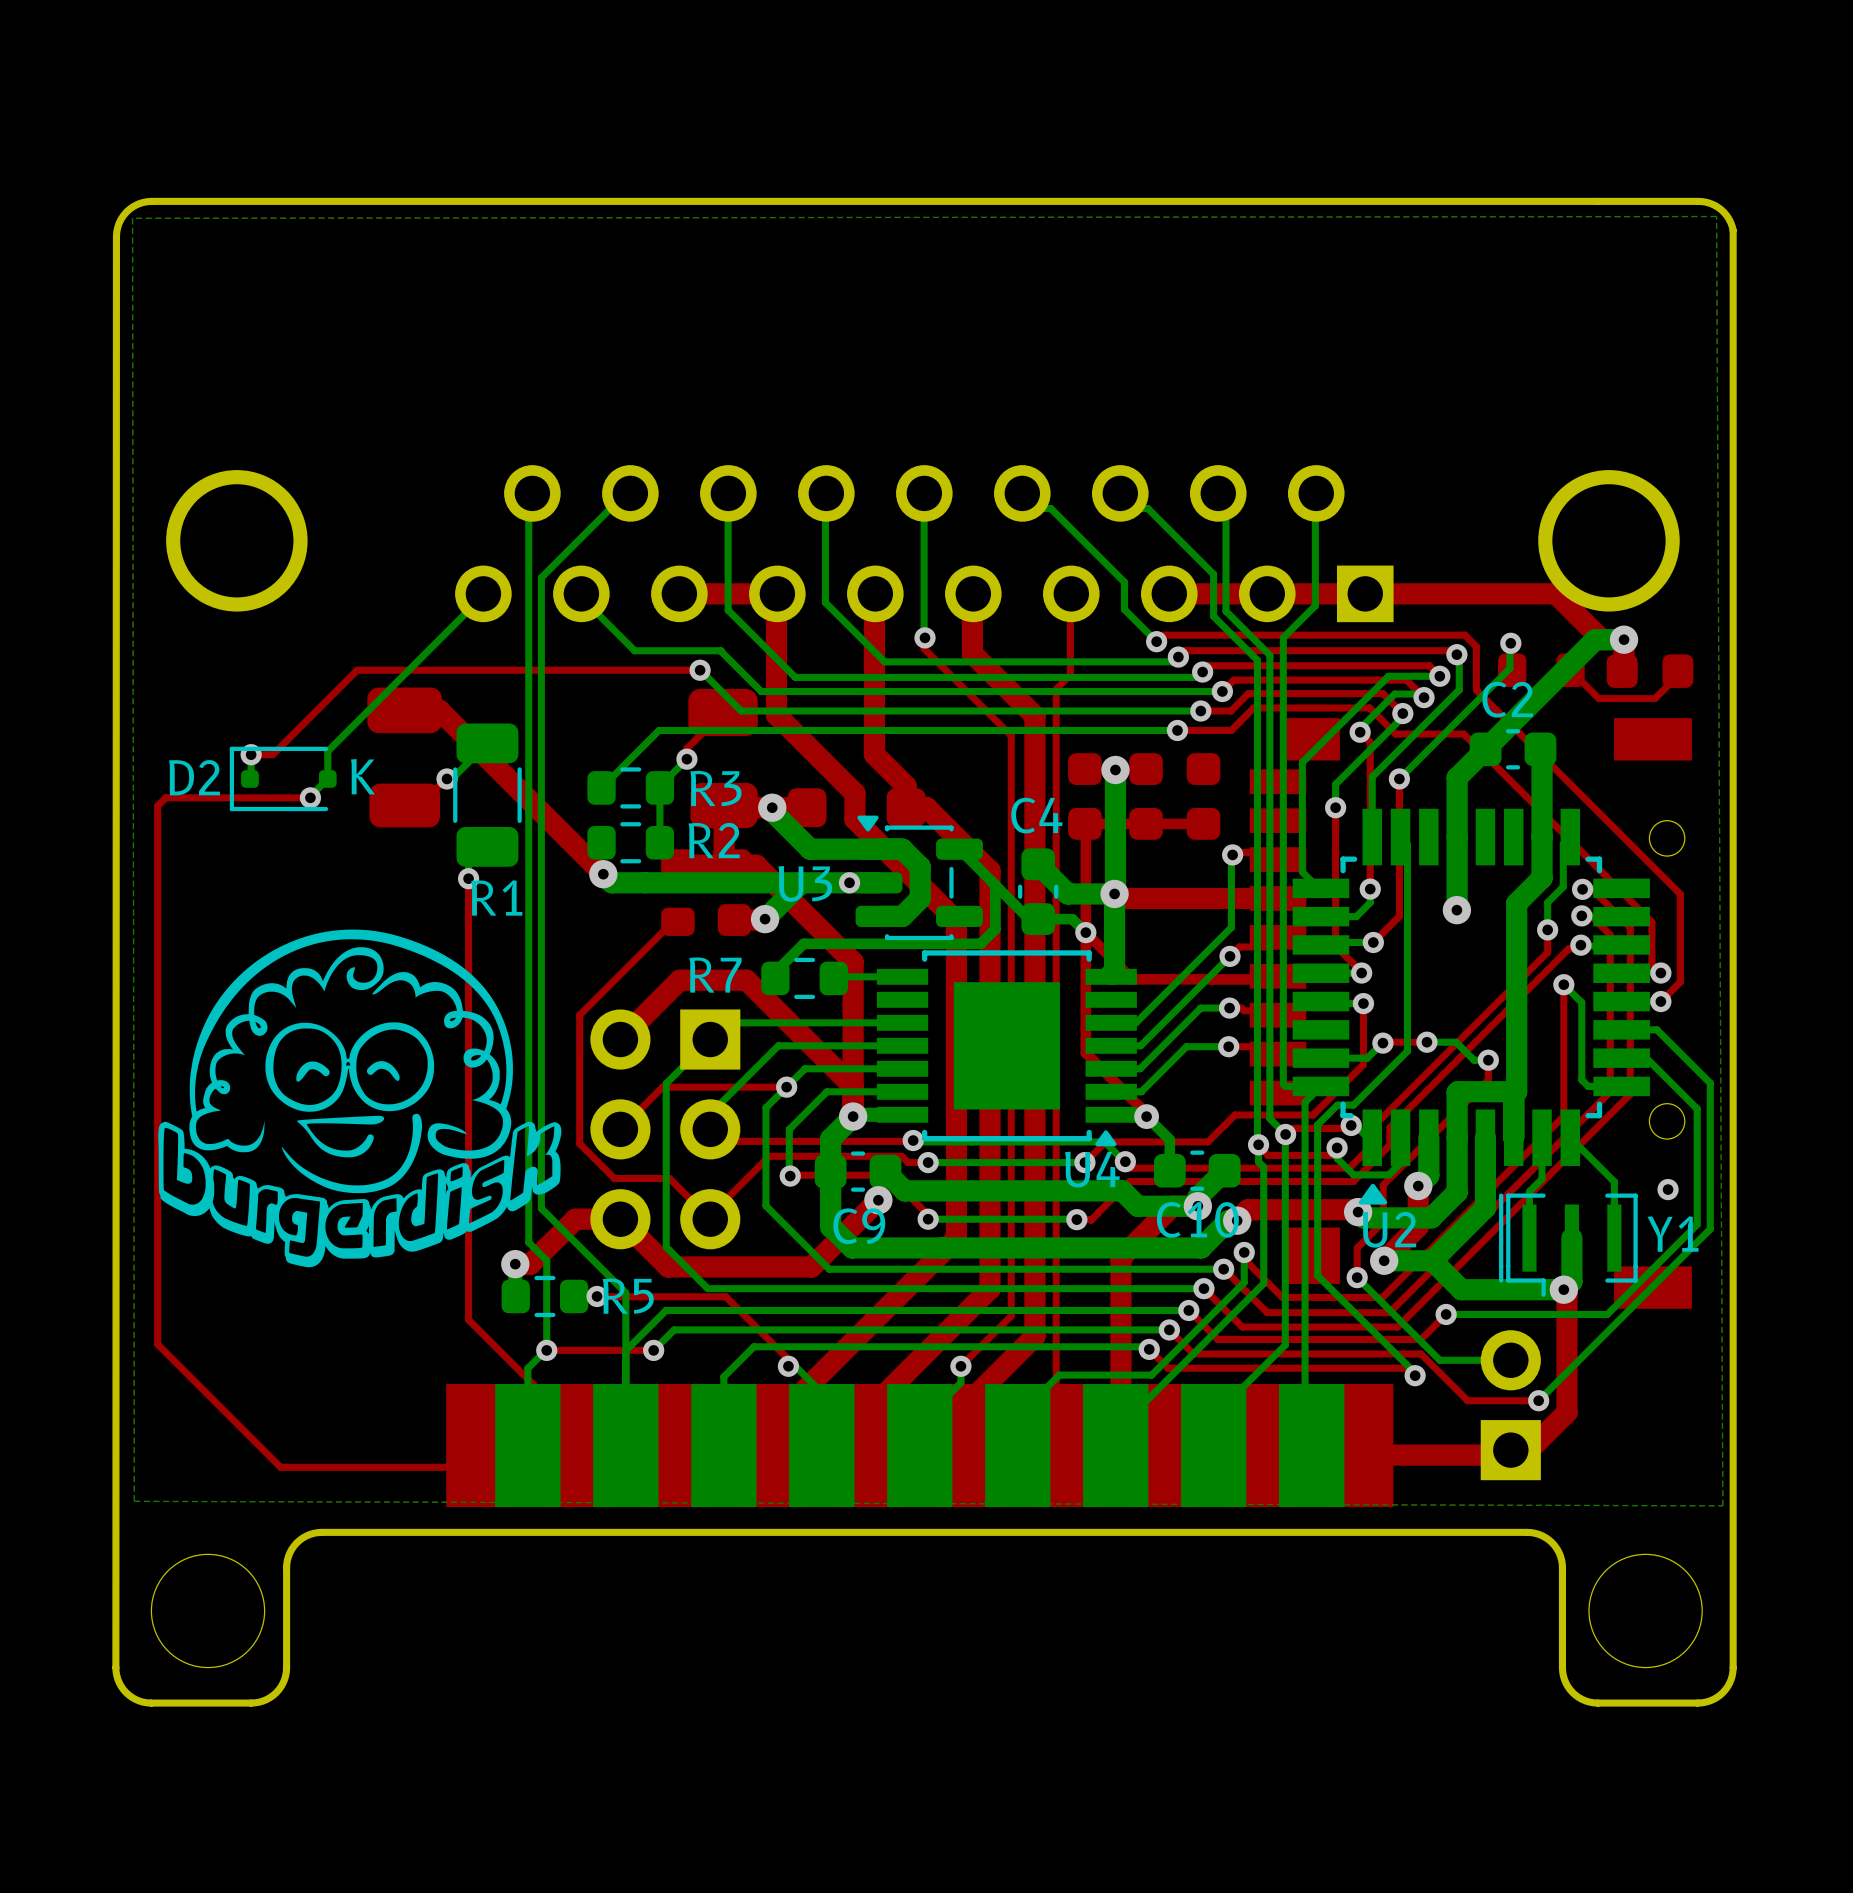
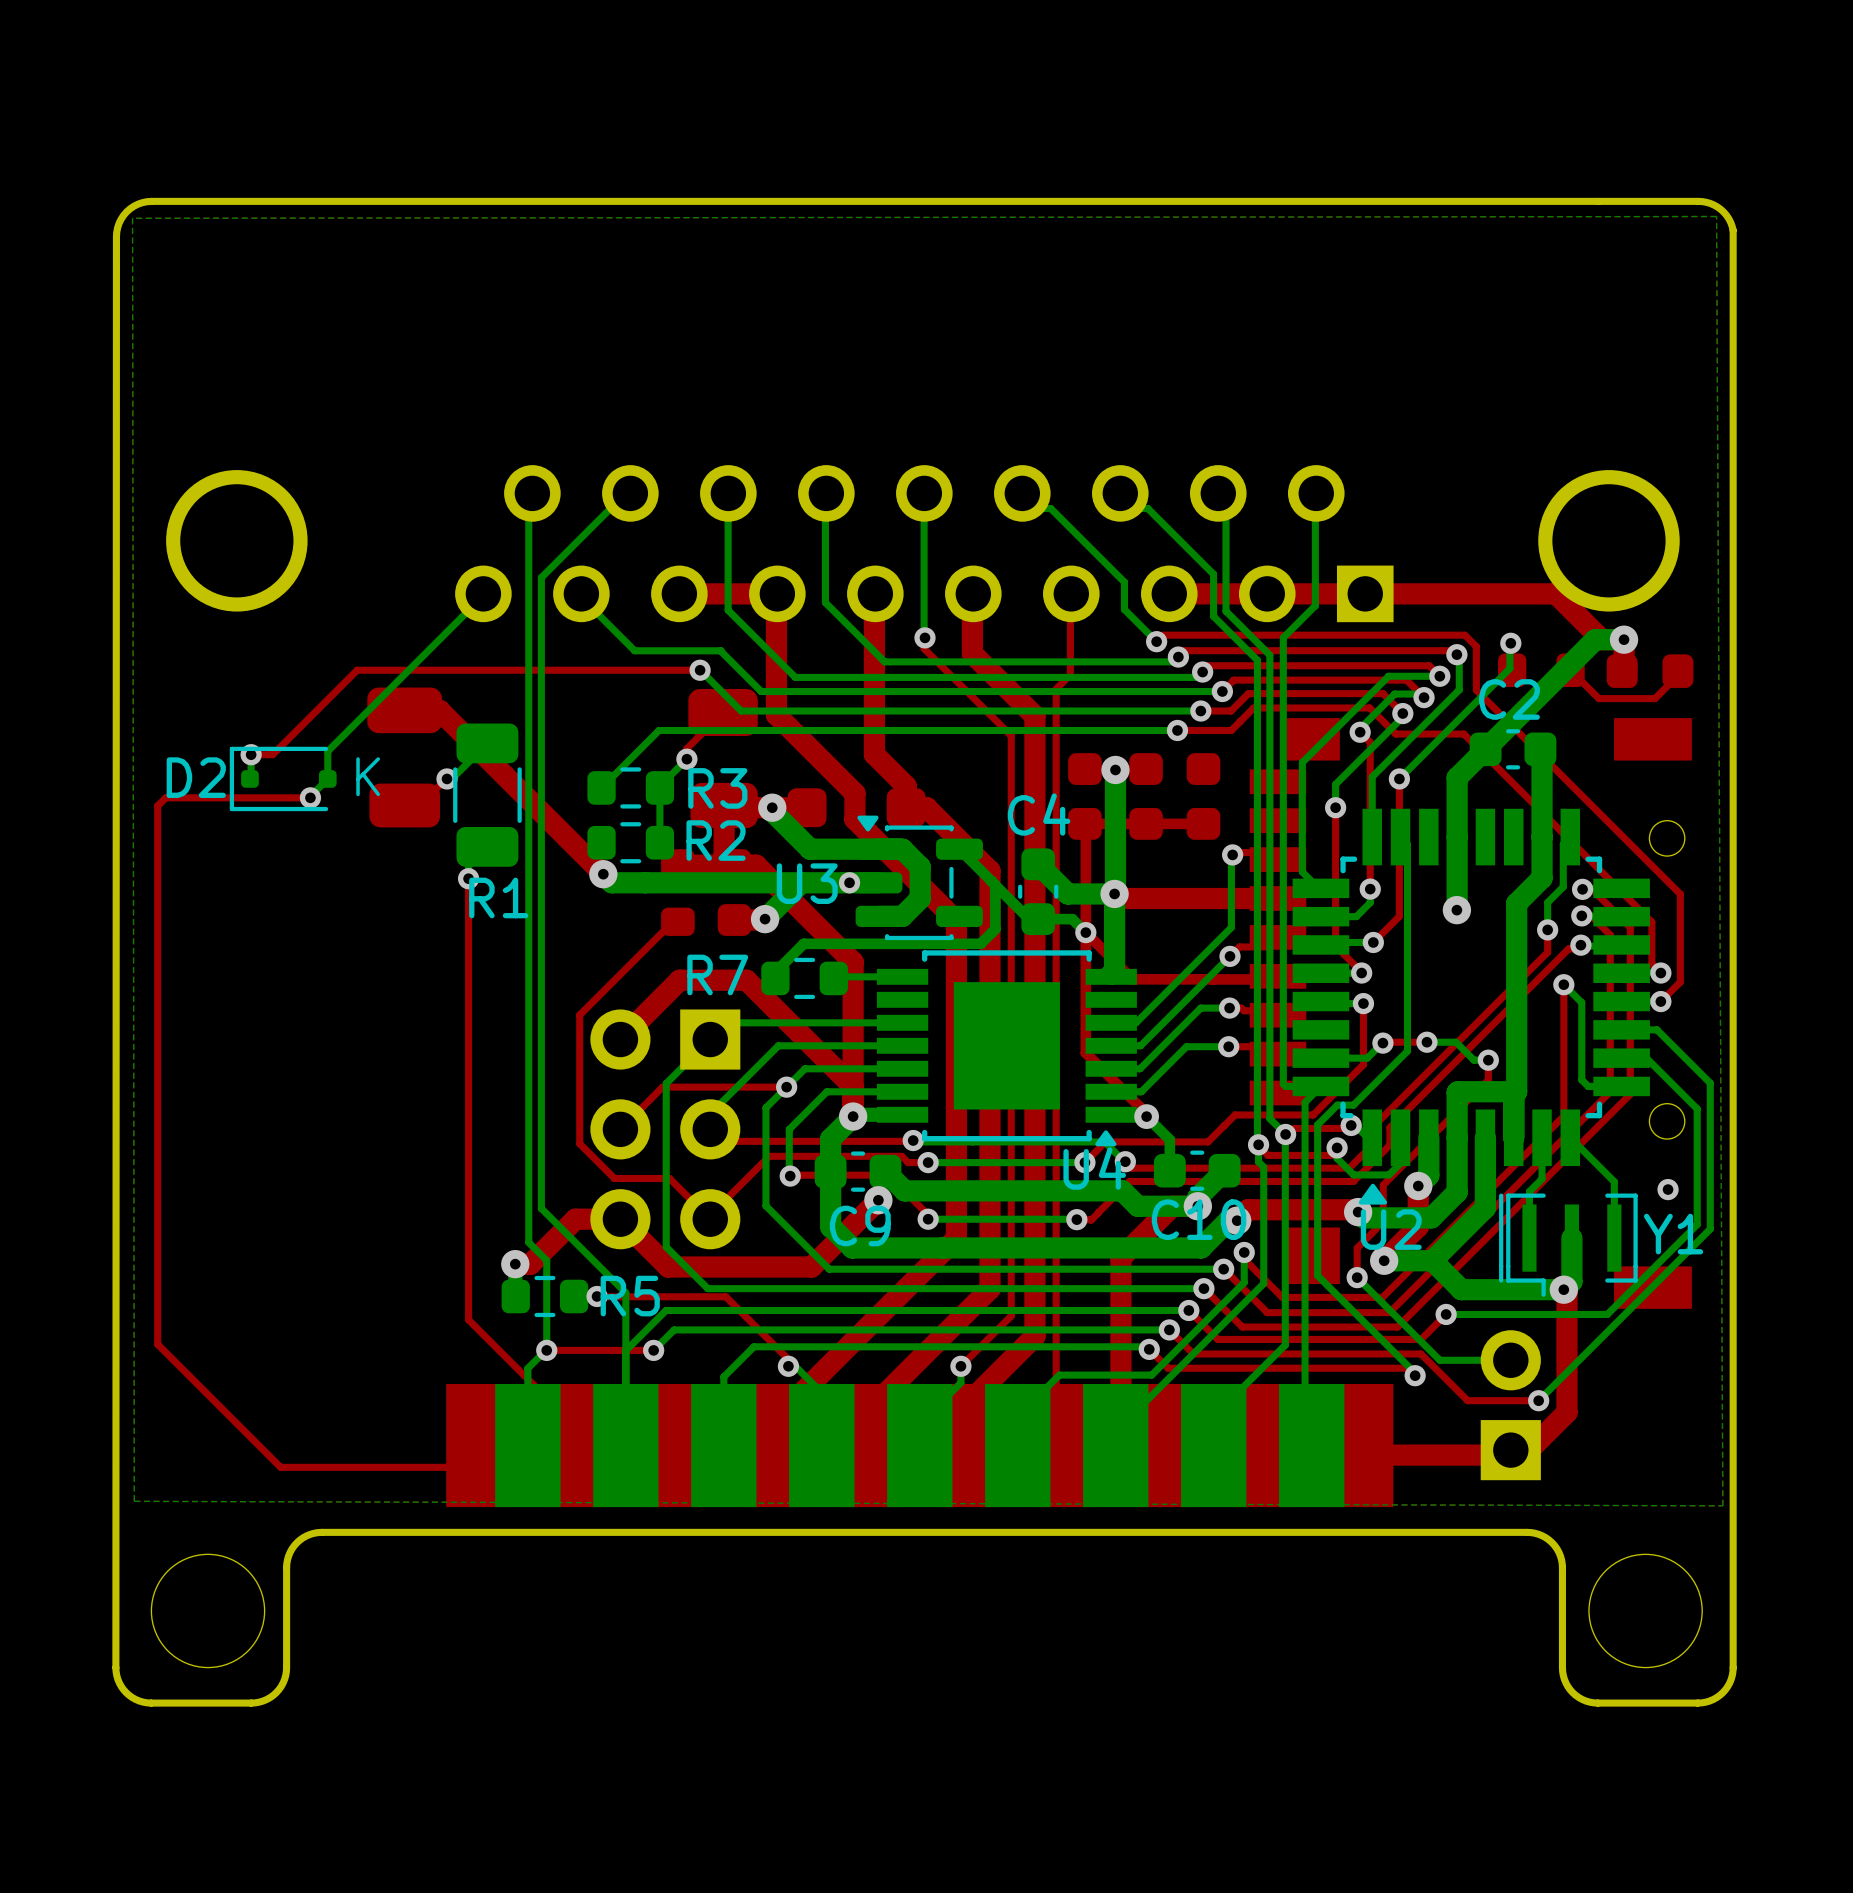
drawing: [158, 929, 562, 1268] -> none

